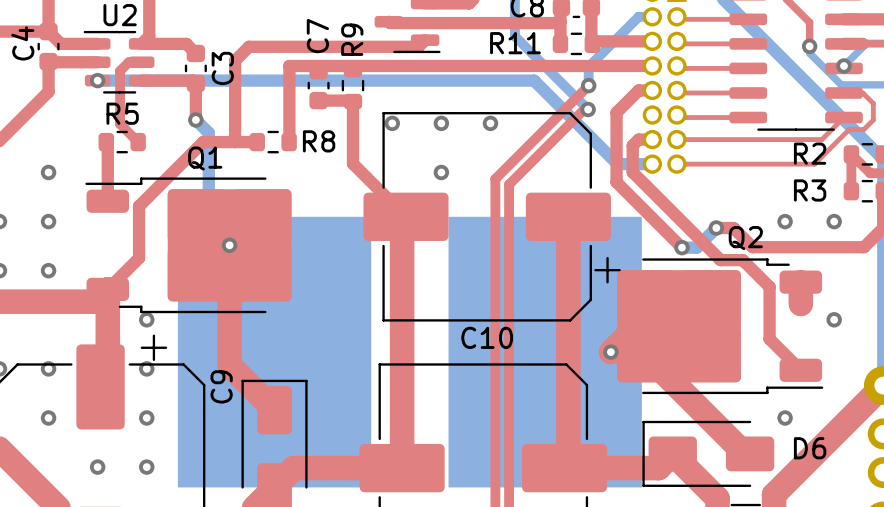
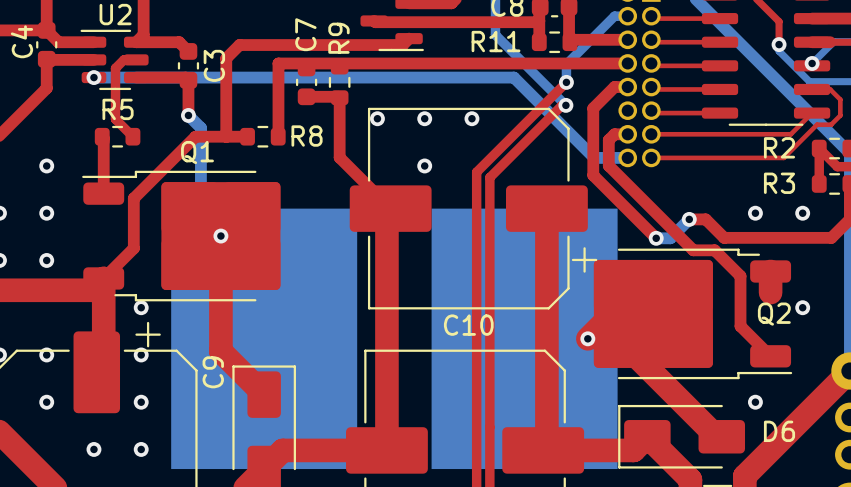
Q2 name position: Q2 (745, 238) -> Q2 (774, 314)

